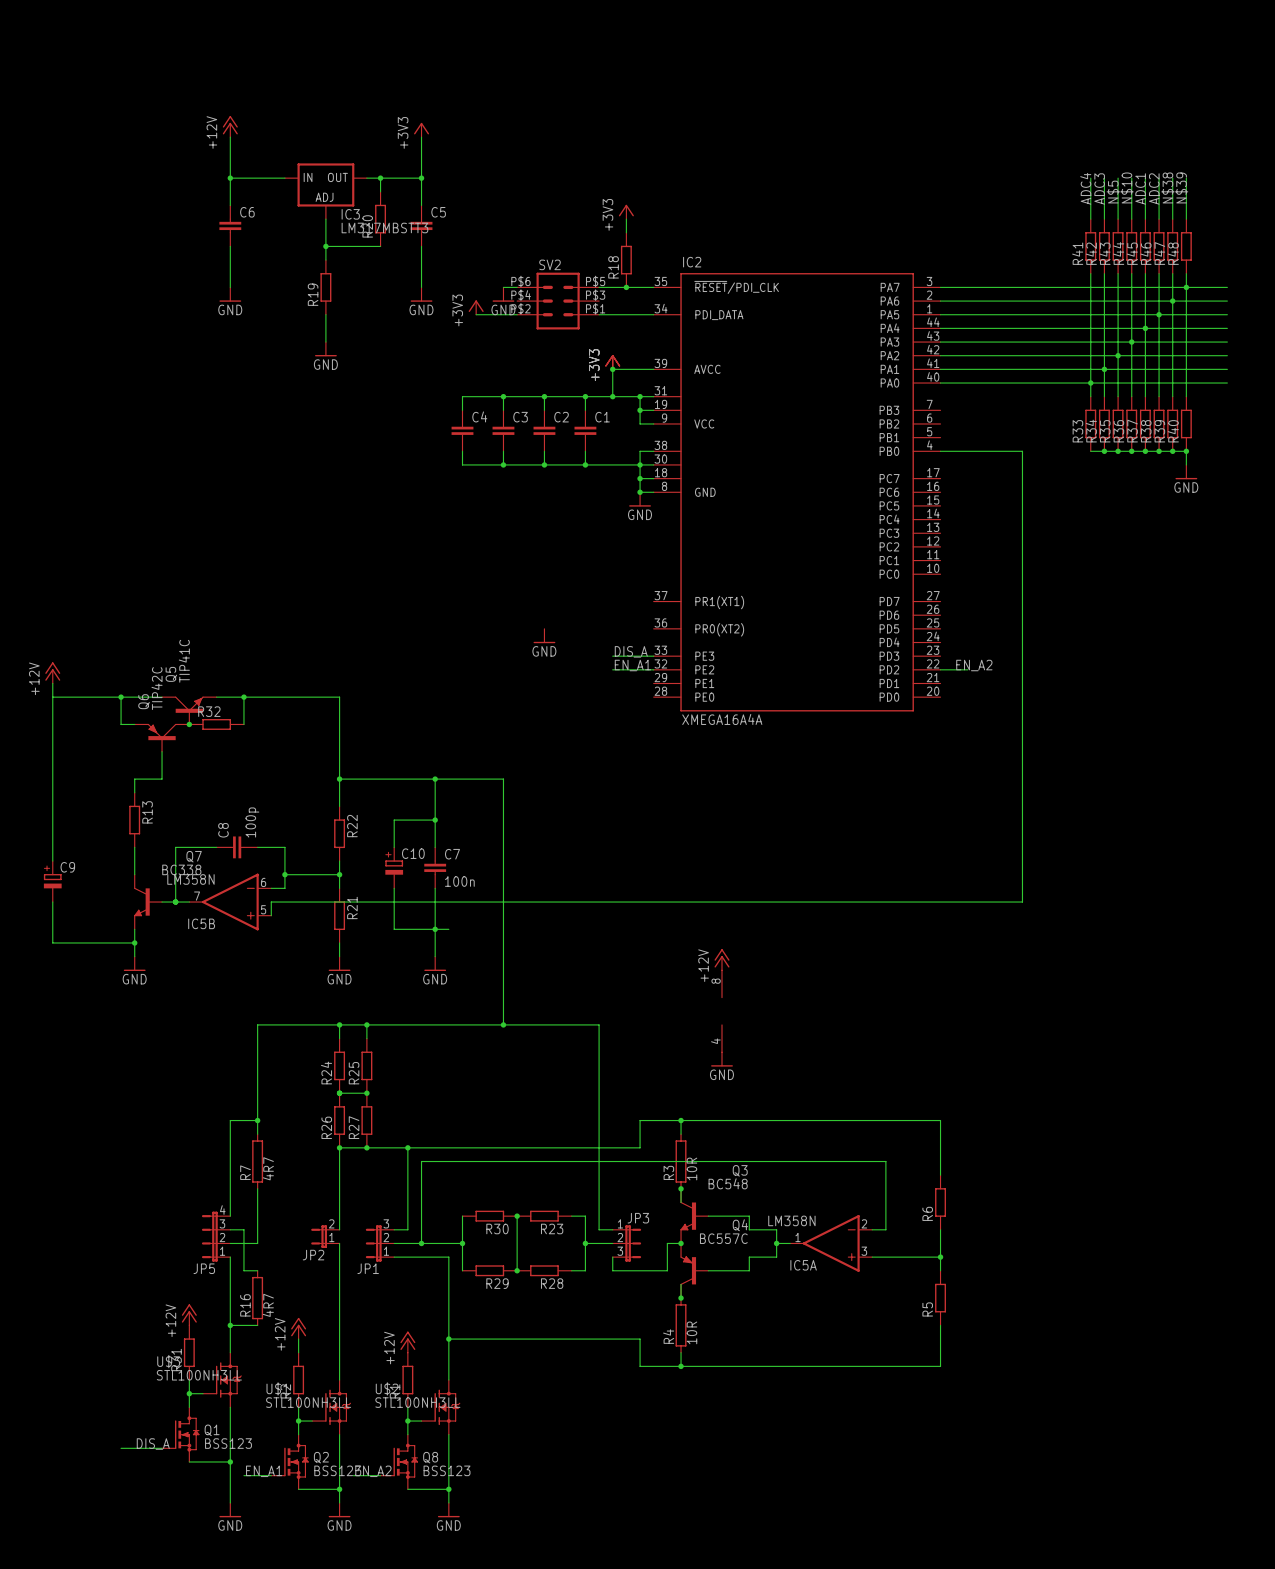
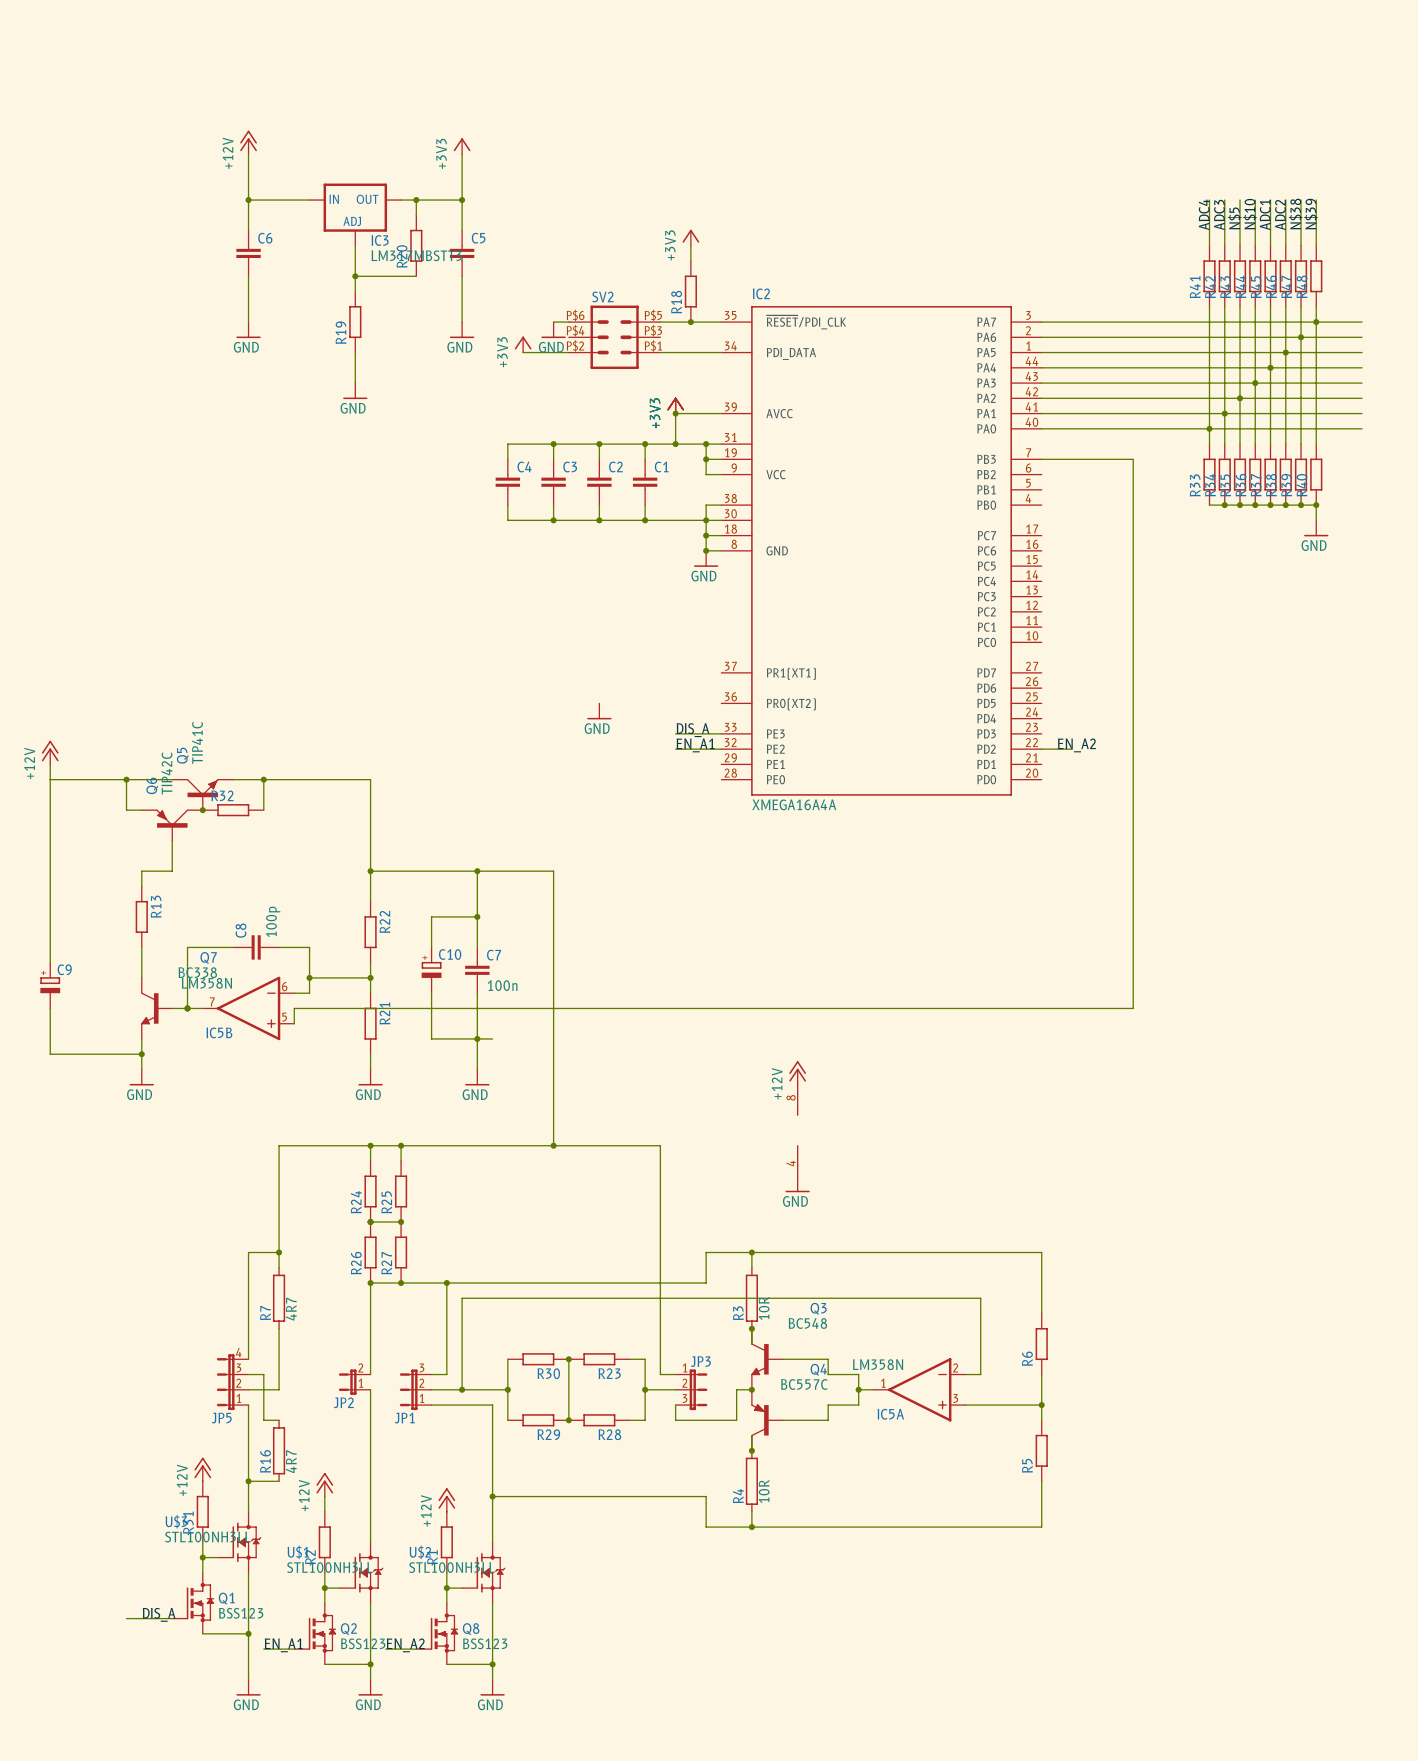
wire: (940, 451) (1022, 451) -> (1041, 459) (1133, 459) (1133, 505)

